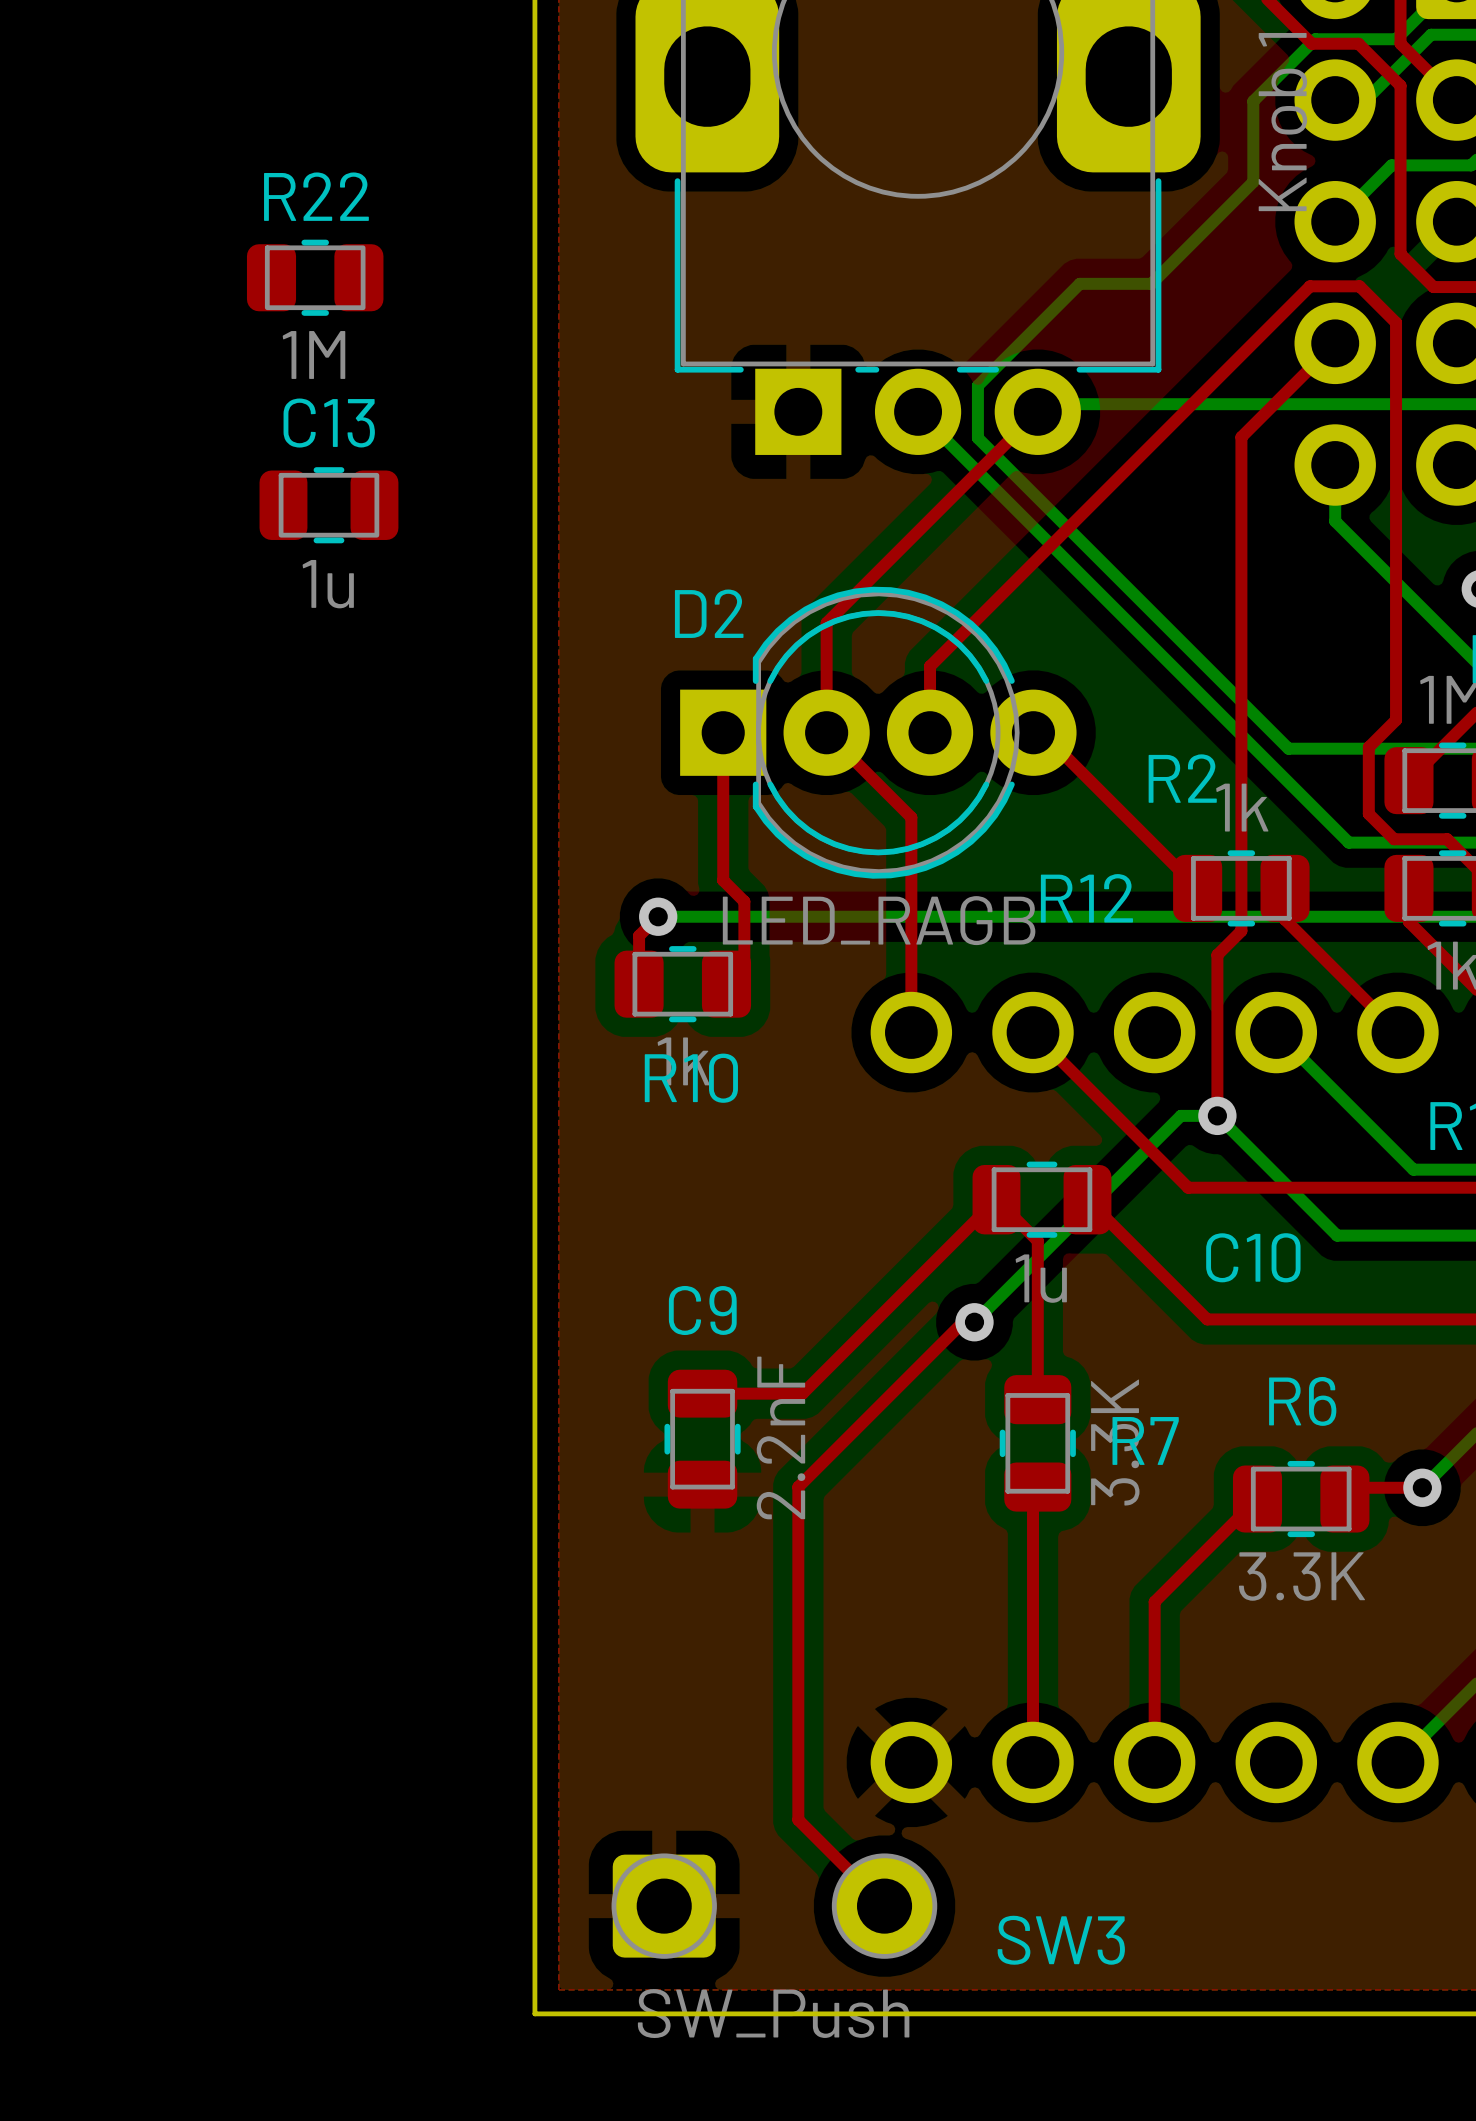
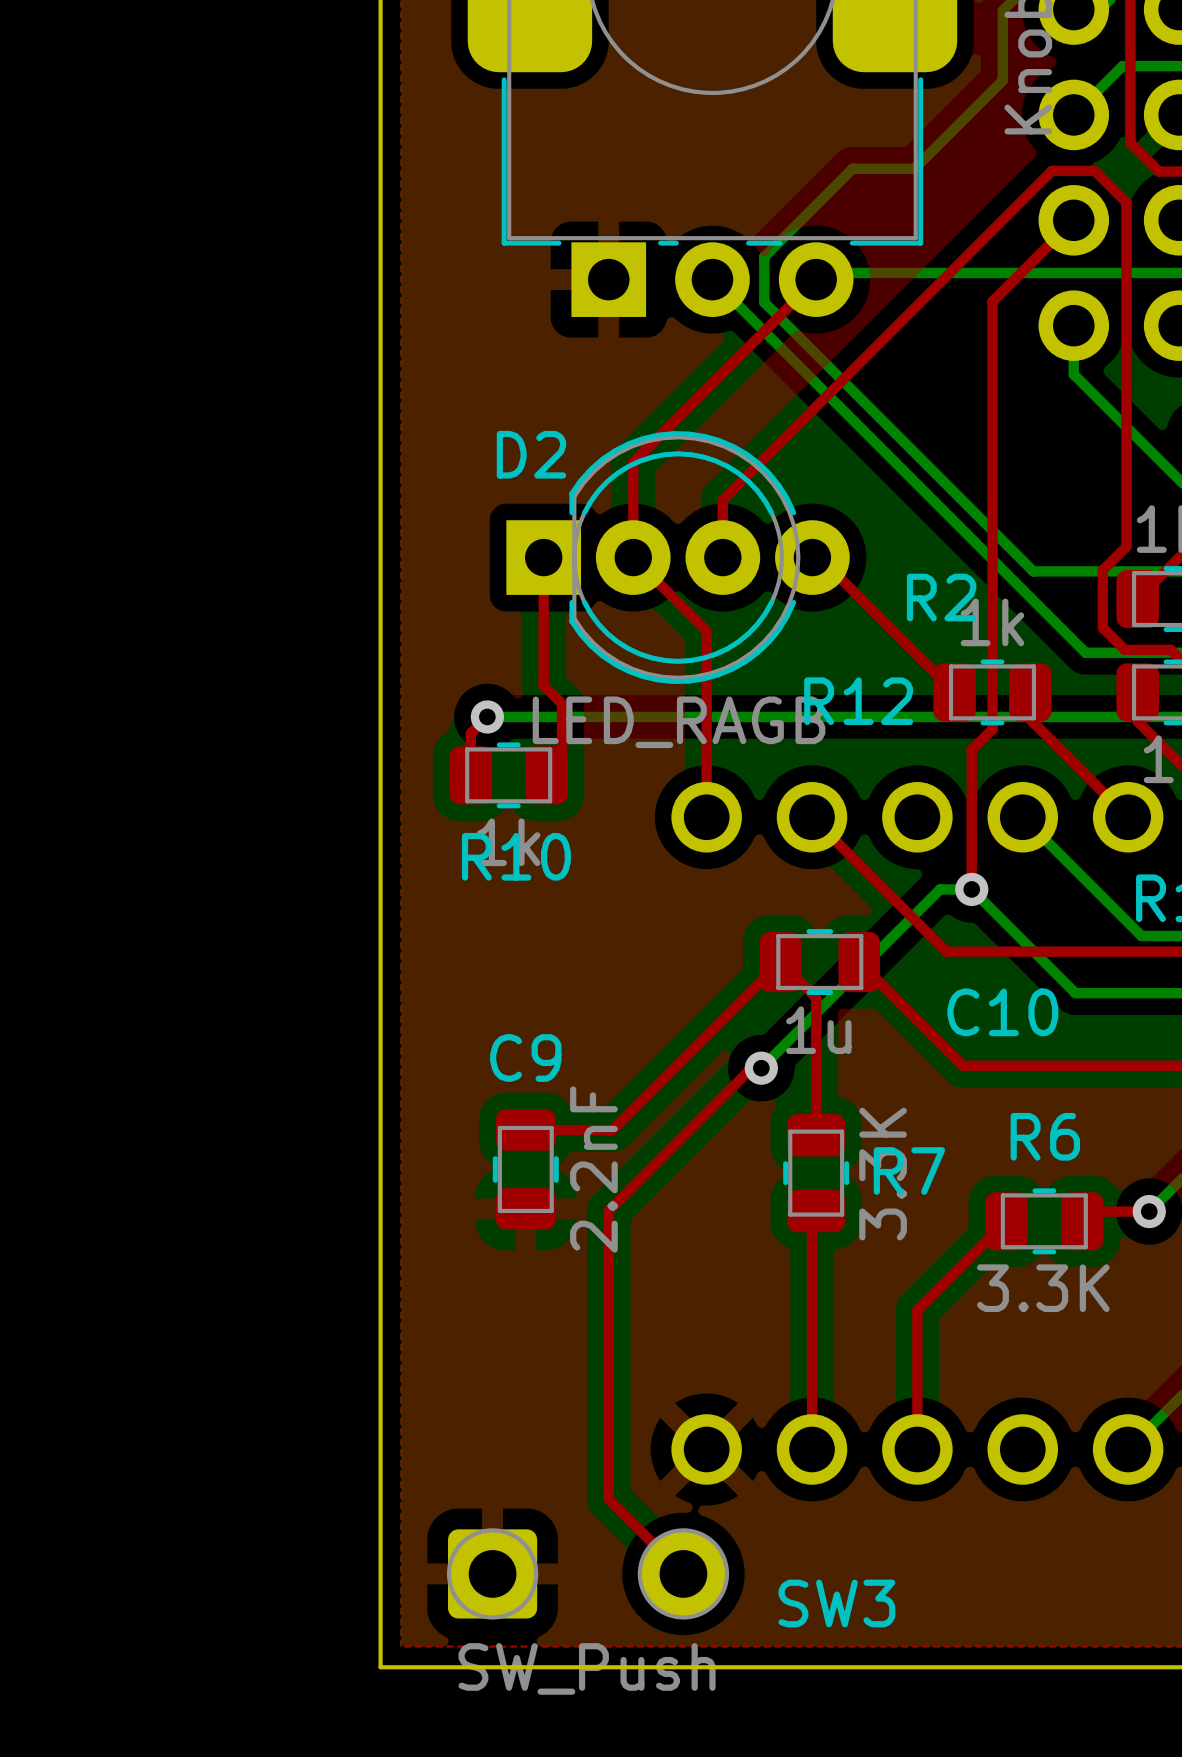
R22: 1M (315, 277) -> none
C13: 1u (328, 505) -> none

